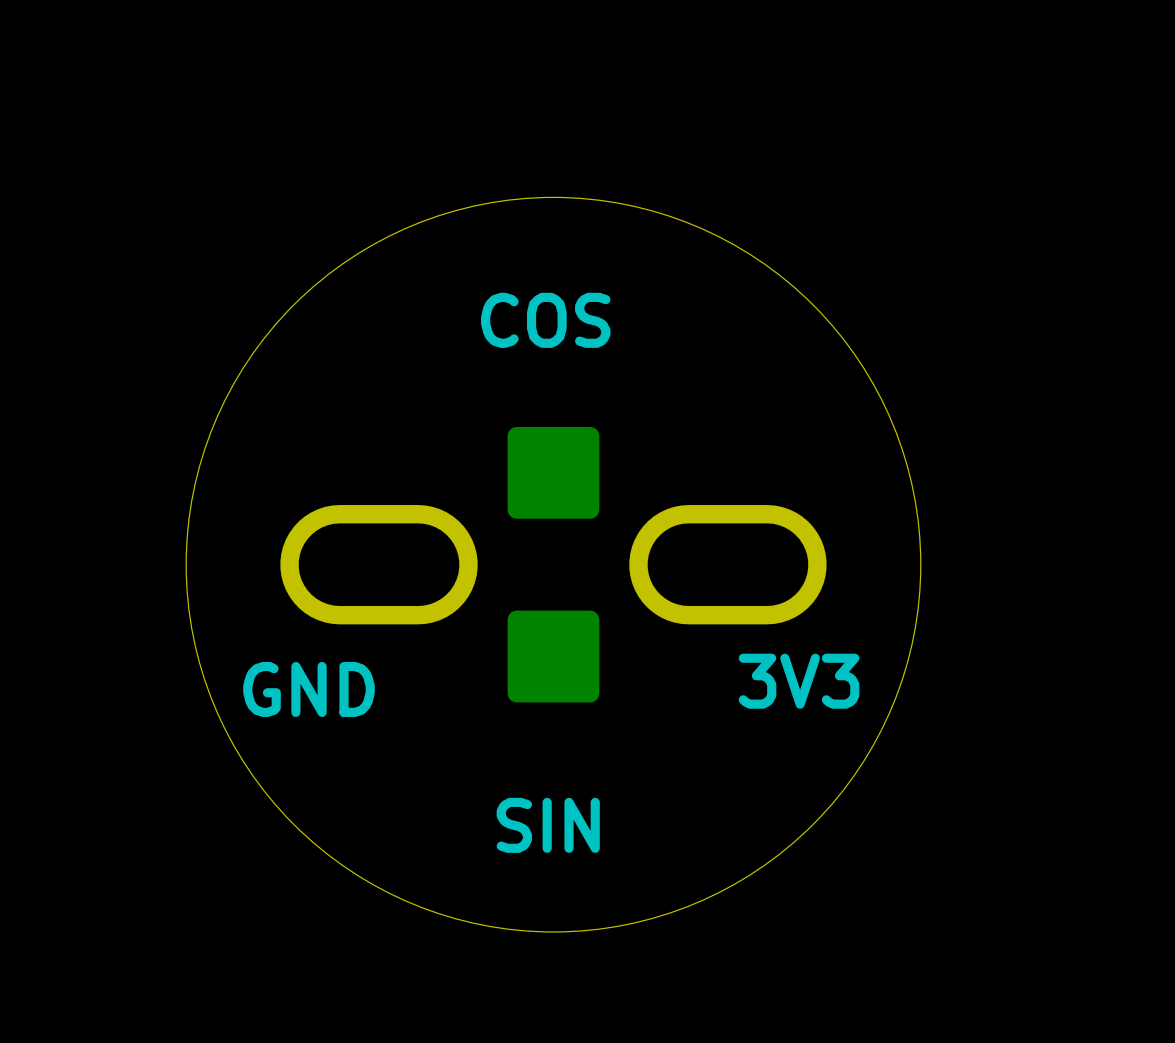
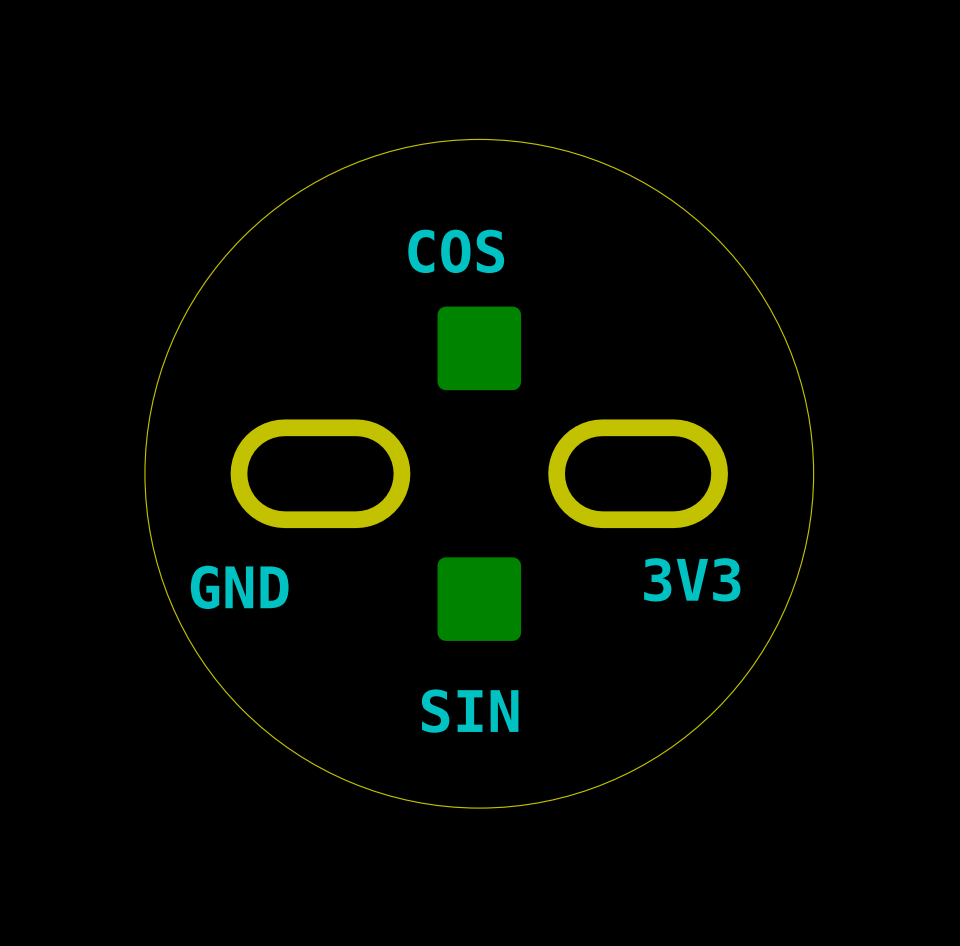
part position: (553, 472) -> (479, 348)
part position: (553, 656) -> (479, 599)

